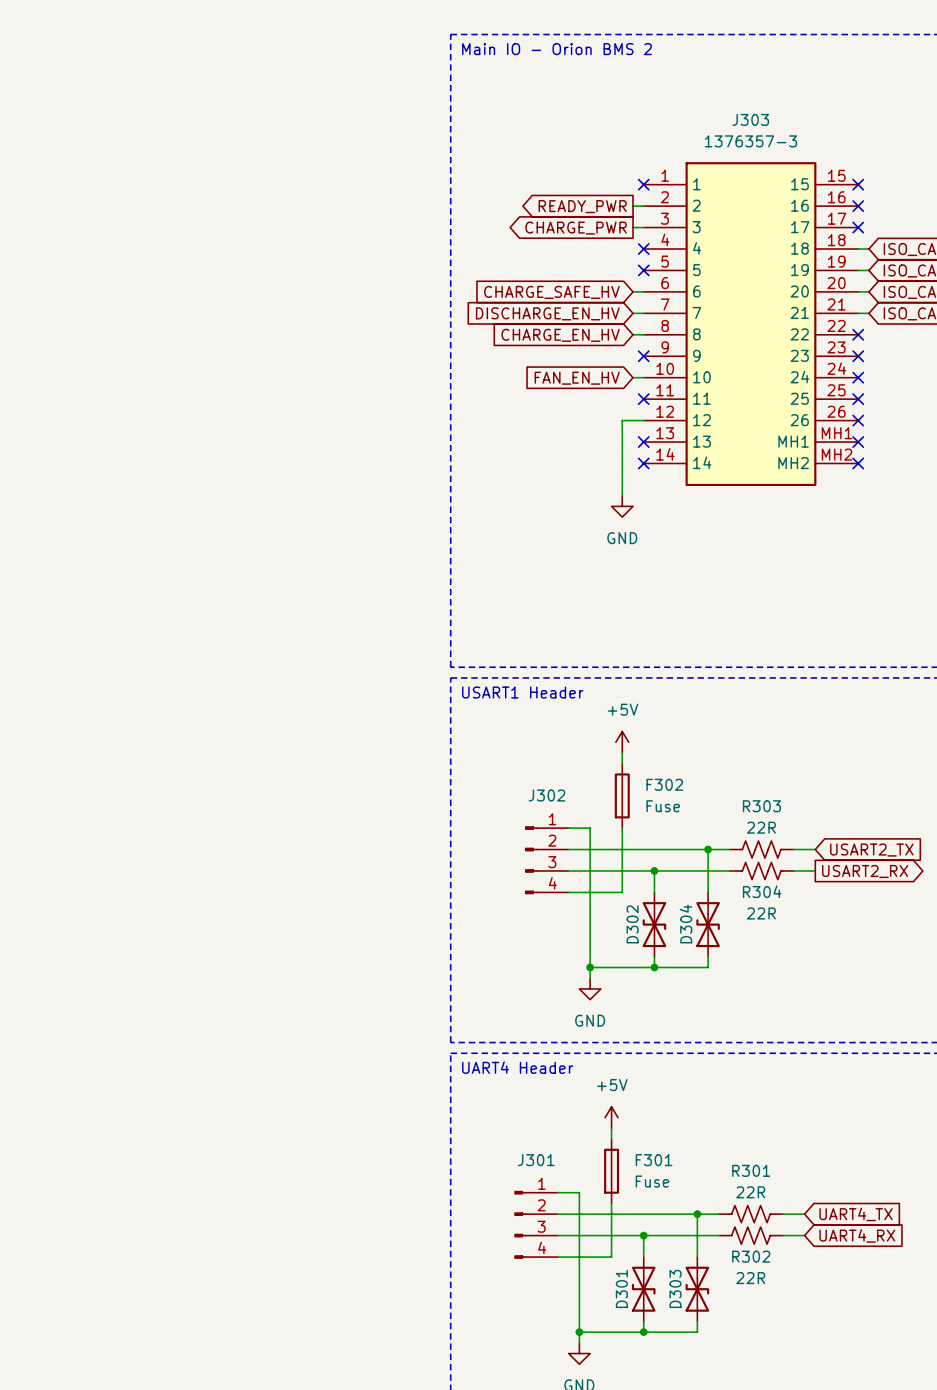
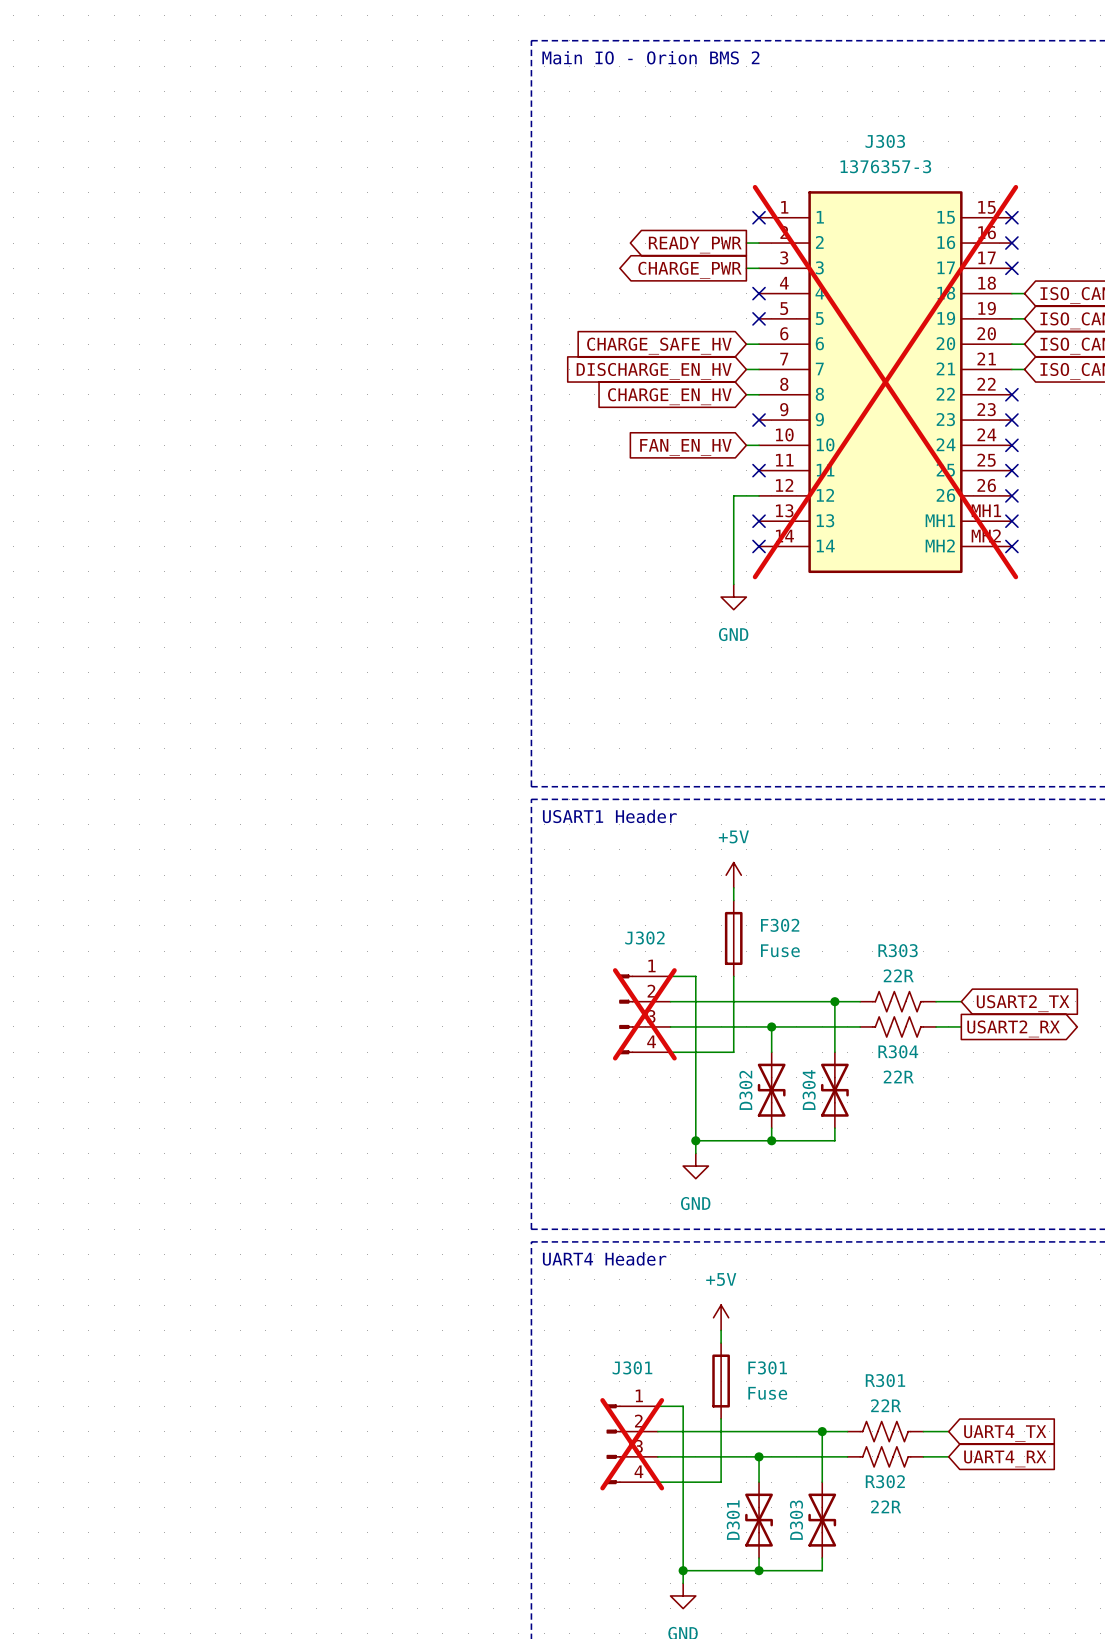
J303 do-not-place cross: none -> (885, 382)
J302 do-not-place cross: none -> (644, 1014)
J301 do-not-place cross: none -> (632, 1444)

